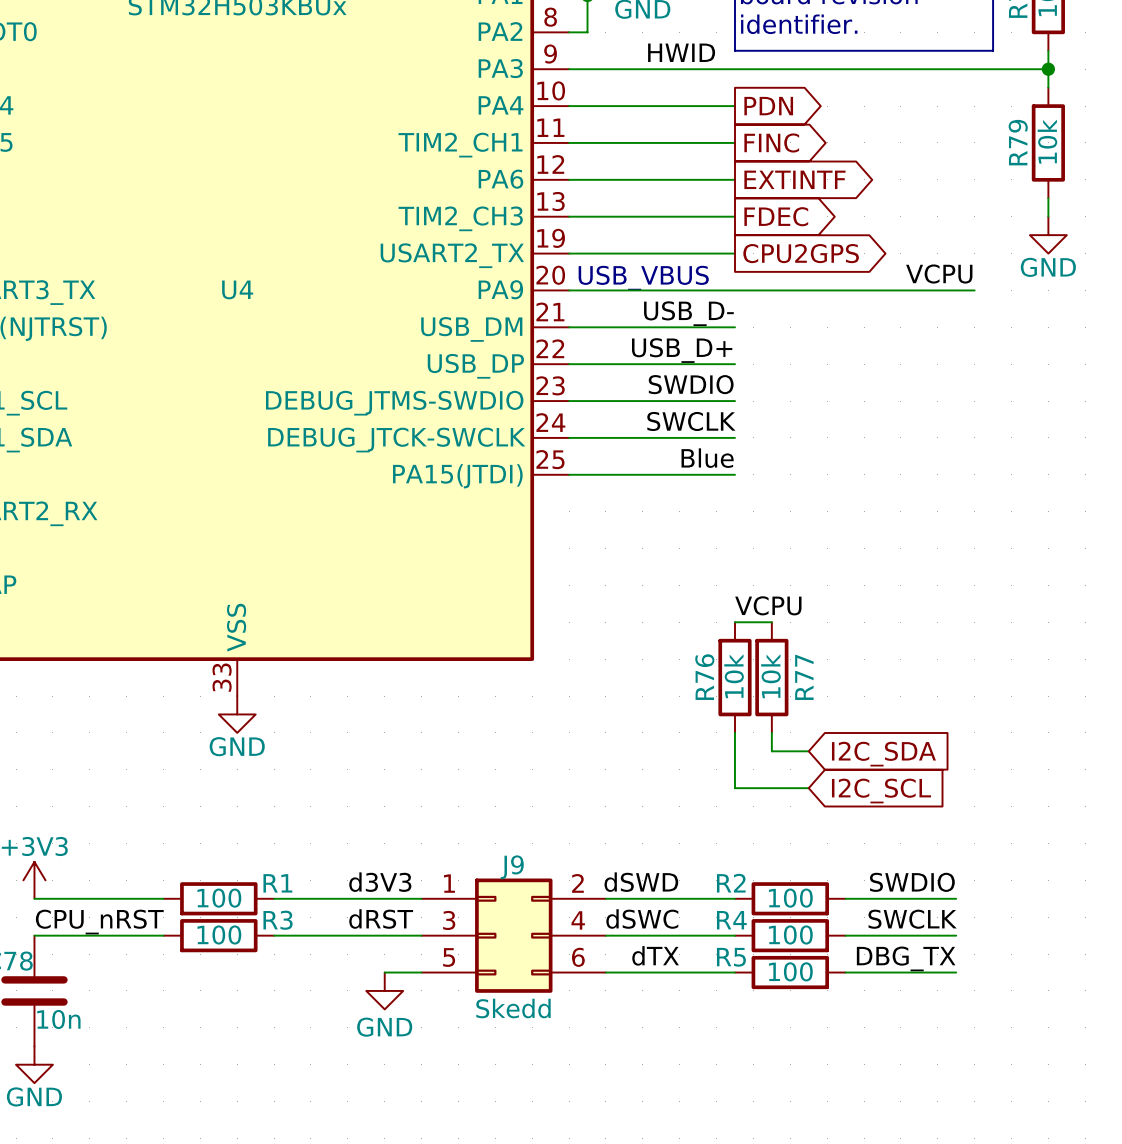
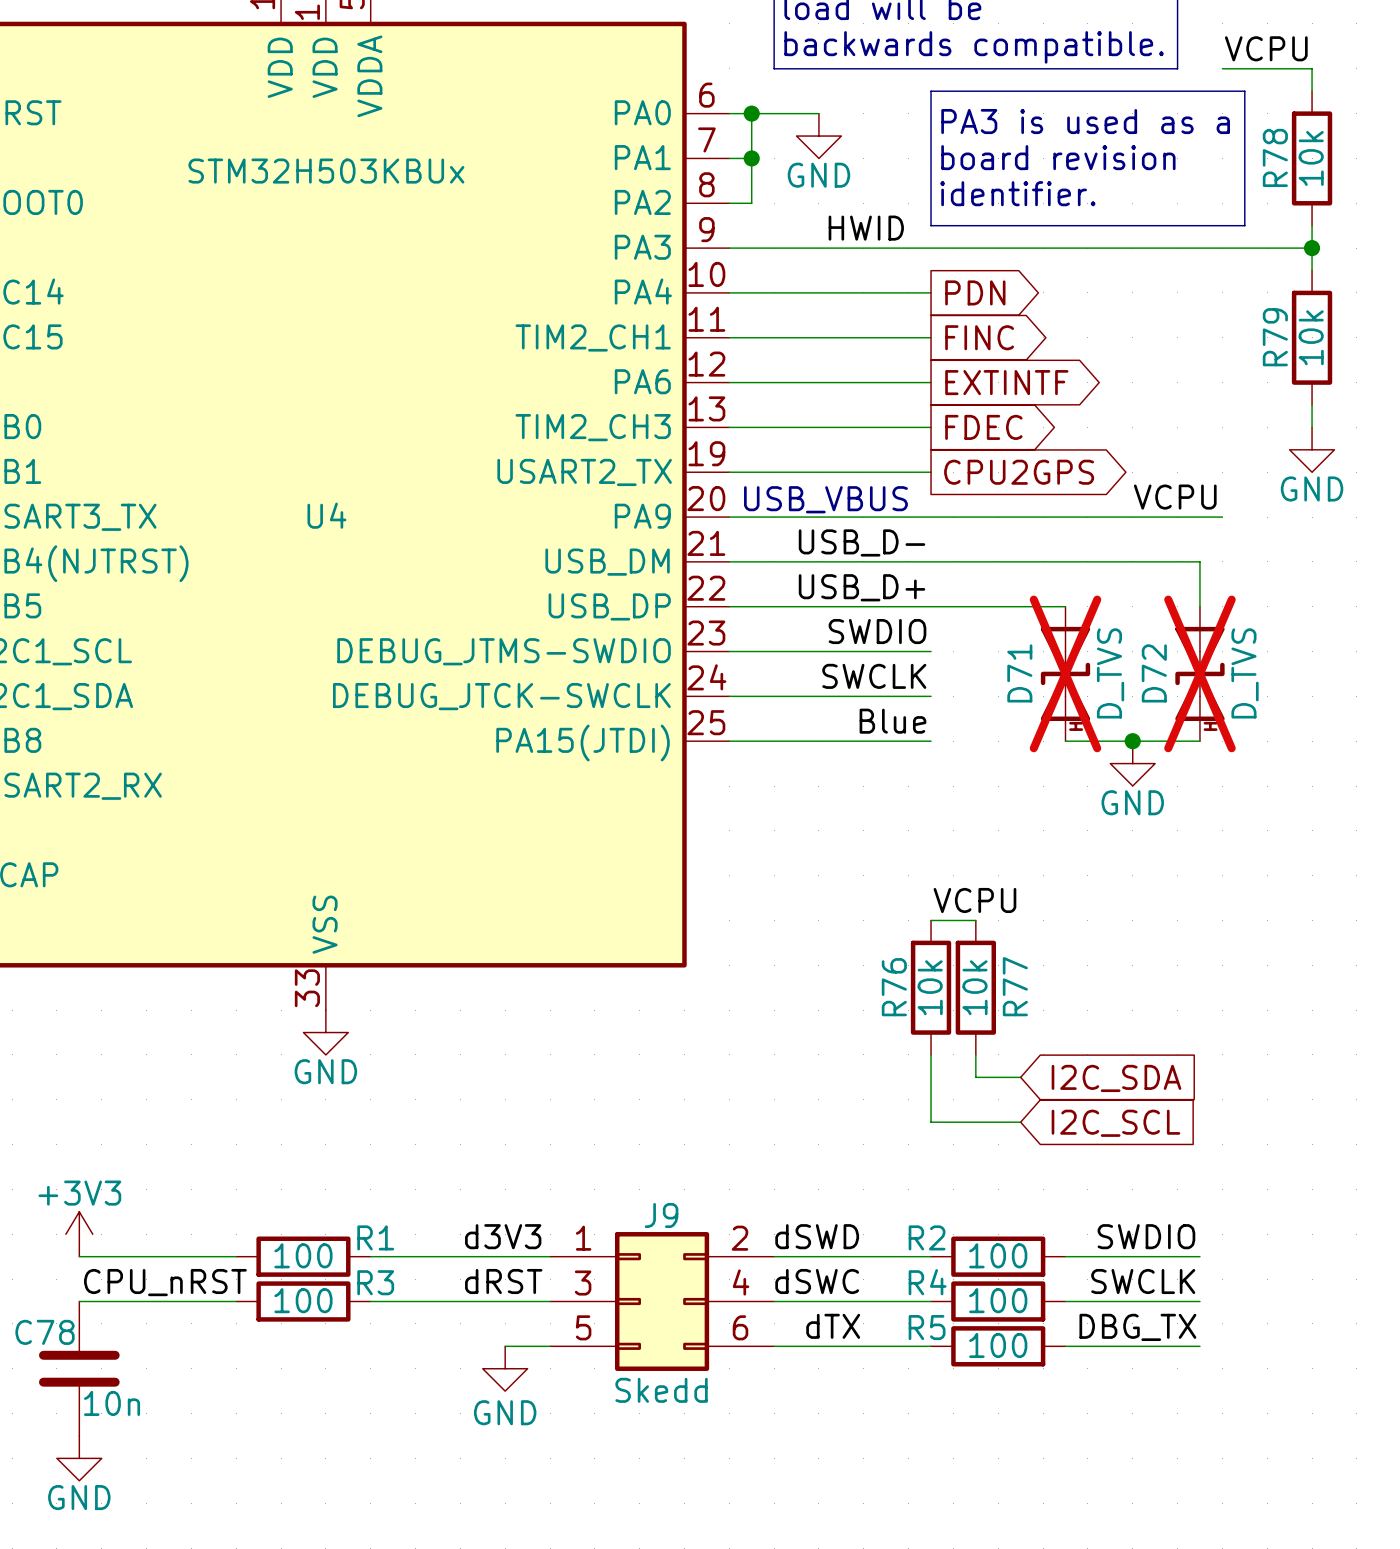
wire: none -> (931, 561) (1199, 561) (1199, 606)
wire: none -> (931, 606) (1065, 606)
D71: none -> D_TVS (1065, 673)
D72: none -> D_TVS (1199, 673)
wire: none -> (1065, 741) (1199, 741)
junction: none -> (1132, 741)
power symbol: none -> GND (1132, 763)

